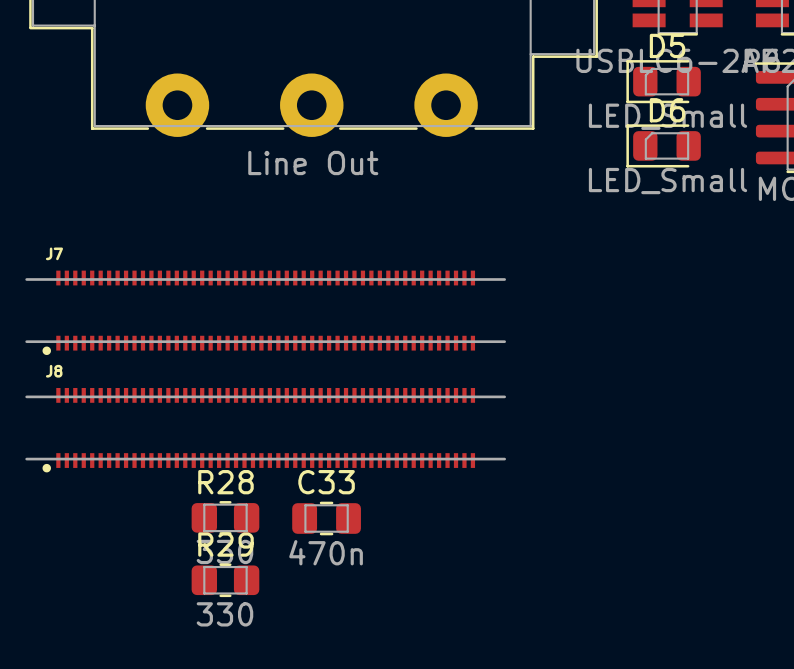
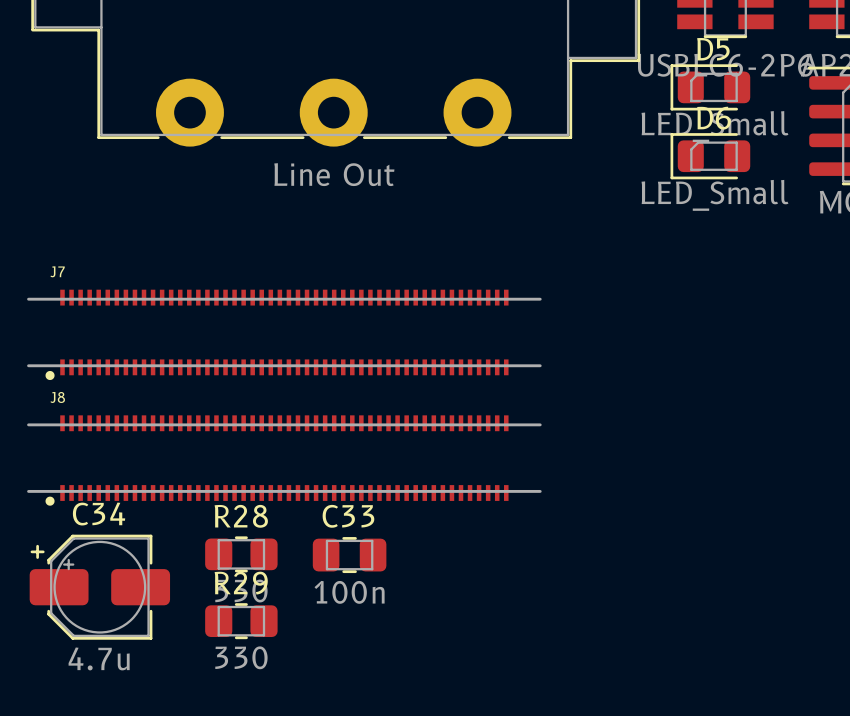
C34: none -> 4.7u (99, 587)
C33 value: 470n (326, 552) -> 100n (349, 592)

